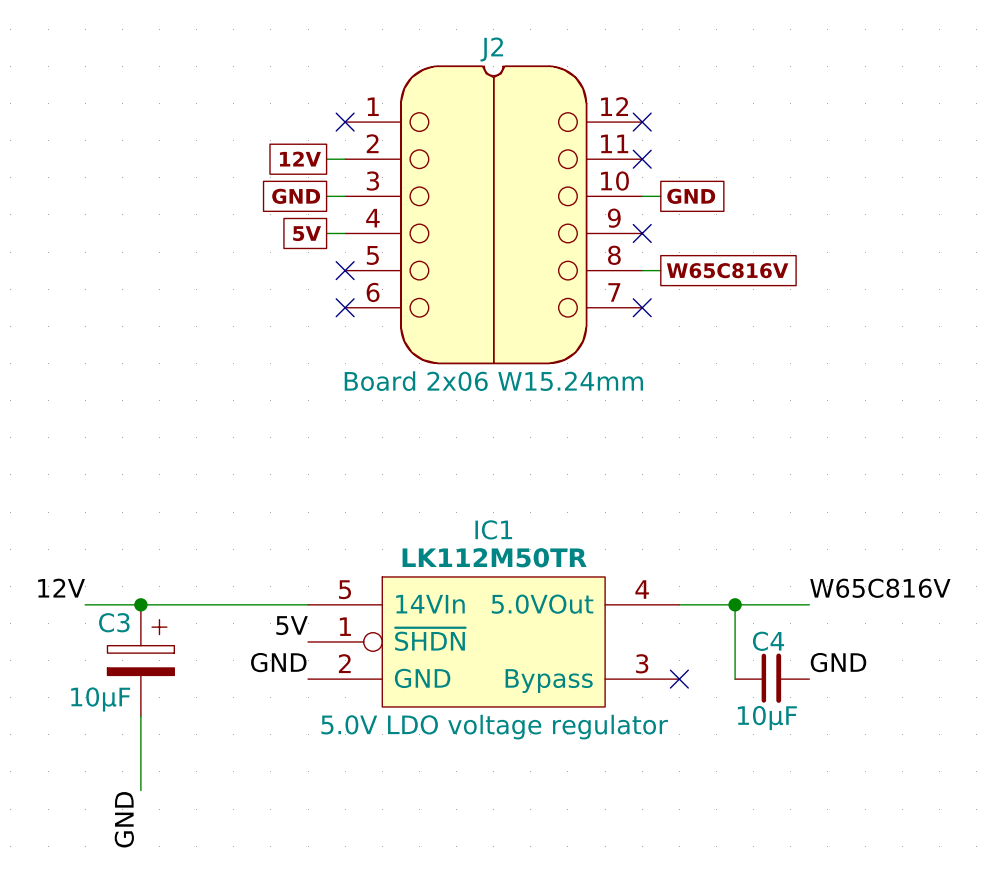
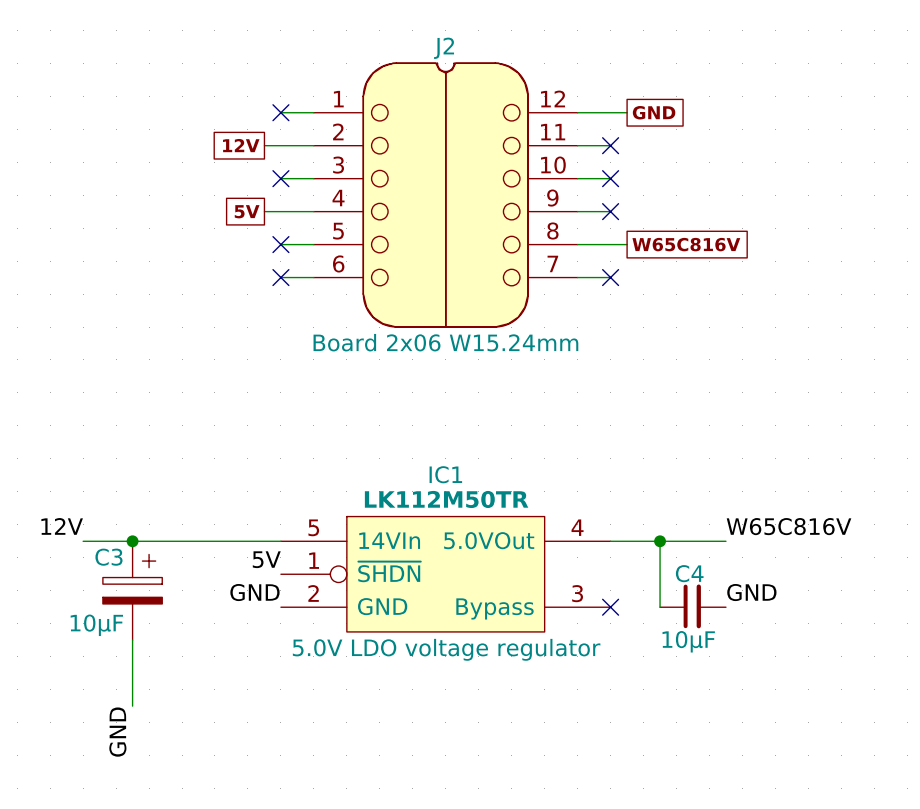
wire: none -> (280, 112) (313, 112)
no-connect mark position: (345, 122) -> (280, 112)
wire: none -> (577, 112) (627, 112)
no-connect mark: (642, 122) -> none
wire: none -> (264, 145) (297, 145)
global label position: 12V (300, 159) -> 12V (241, 145)
wire: none -> (577, 145) (610, 145)
no-connect mark: (642, 159) -> none
no-connect mark: none -> (610, 145)
global label: GND (296, 196) -> none
wire: none -> (280, 178) (297, 178)
no-connect mark: none -> (280, 178)
wire: none -> (594, 178) (610, 178)
no-connect mark: none -> (610, 178)
global label position: GND (691, 196) -> GND (654, 112)
wire: none -> (264, 211) (297, 211)
global label position: 5V (307, 233) -> 5V (247, 211)
wire: none -> (577, 211) (610, 211)
no-connect mark: (642, 233) -> none
no-connect mark: none -> (610, 211)
wire: none -> (280, 244) (313, 244)
no-connect mark: none -> (280, 244)
no-connect mark: (345, 270) -> none
global label position: W65C816V (727, 270) -> W65C816V (686, 244)
wire: none -> (280, 277) (313, 277)
no-connect mark: none -> (280, 277)
no-connect mark: (345, 307) -> none
wire: none -> (577, 277) (610, 277)
no-connect mark position: (642, 307) -> (610, 277)

